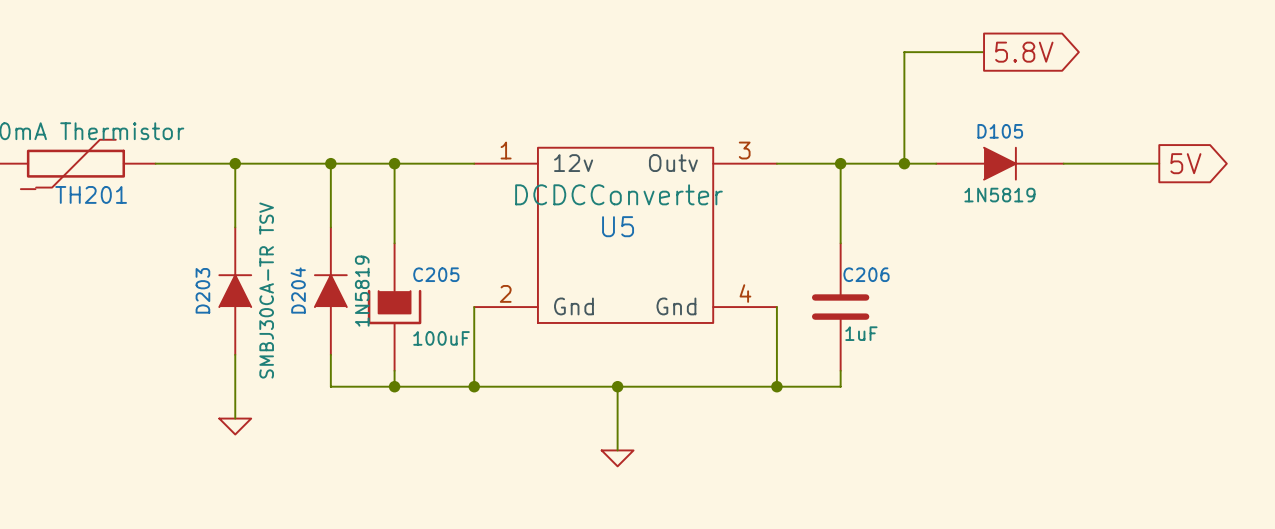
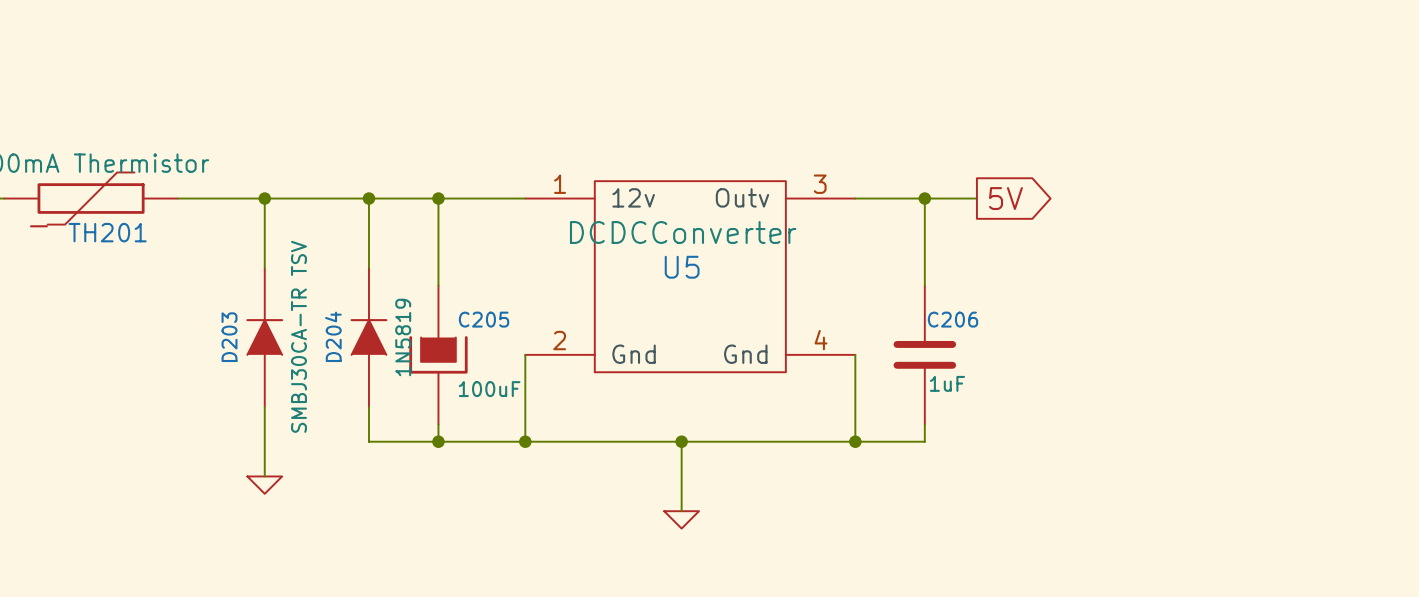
wire: (984, 52) (904, 52) (904, 163) -> none
global label: 5.8V (1024, 52) -> none
wire: (888, 163) (936, 163) -> none
junction: (904, 163) -> none
D105: 1N5819 (999, 163) -> none
wire: (1063, 163) (1159, 163) -> none
global label position: 5V (1185, 163) -> 5V (1005, 198)

